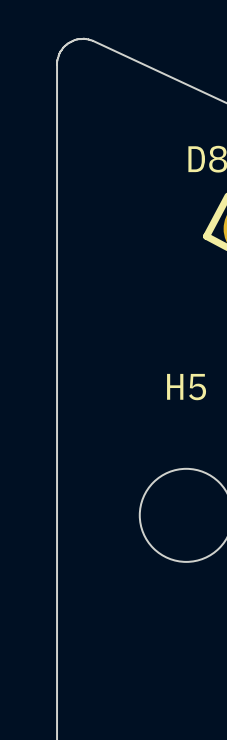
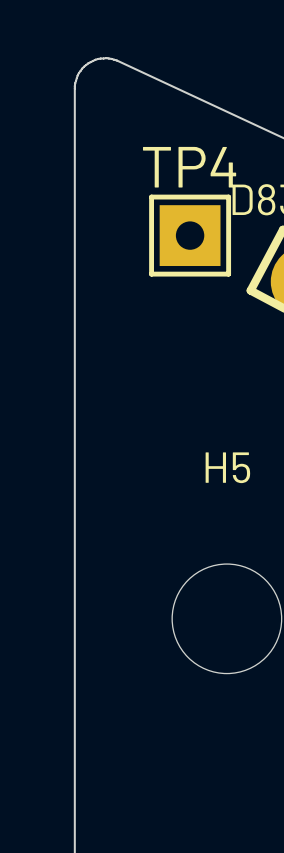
TP4: none -> (190, 235)

